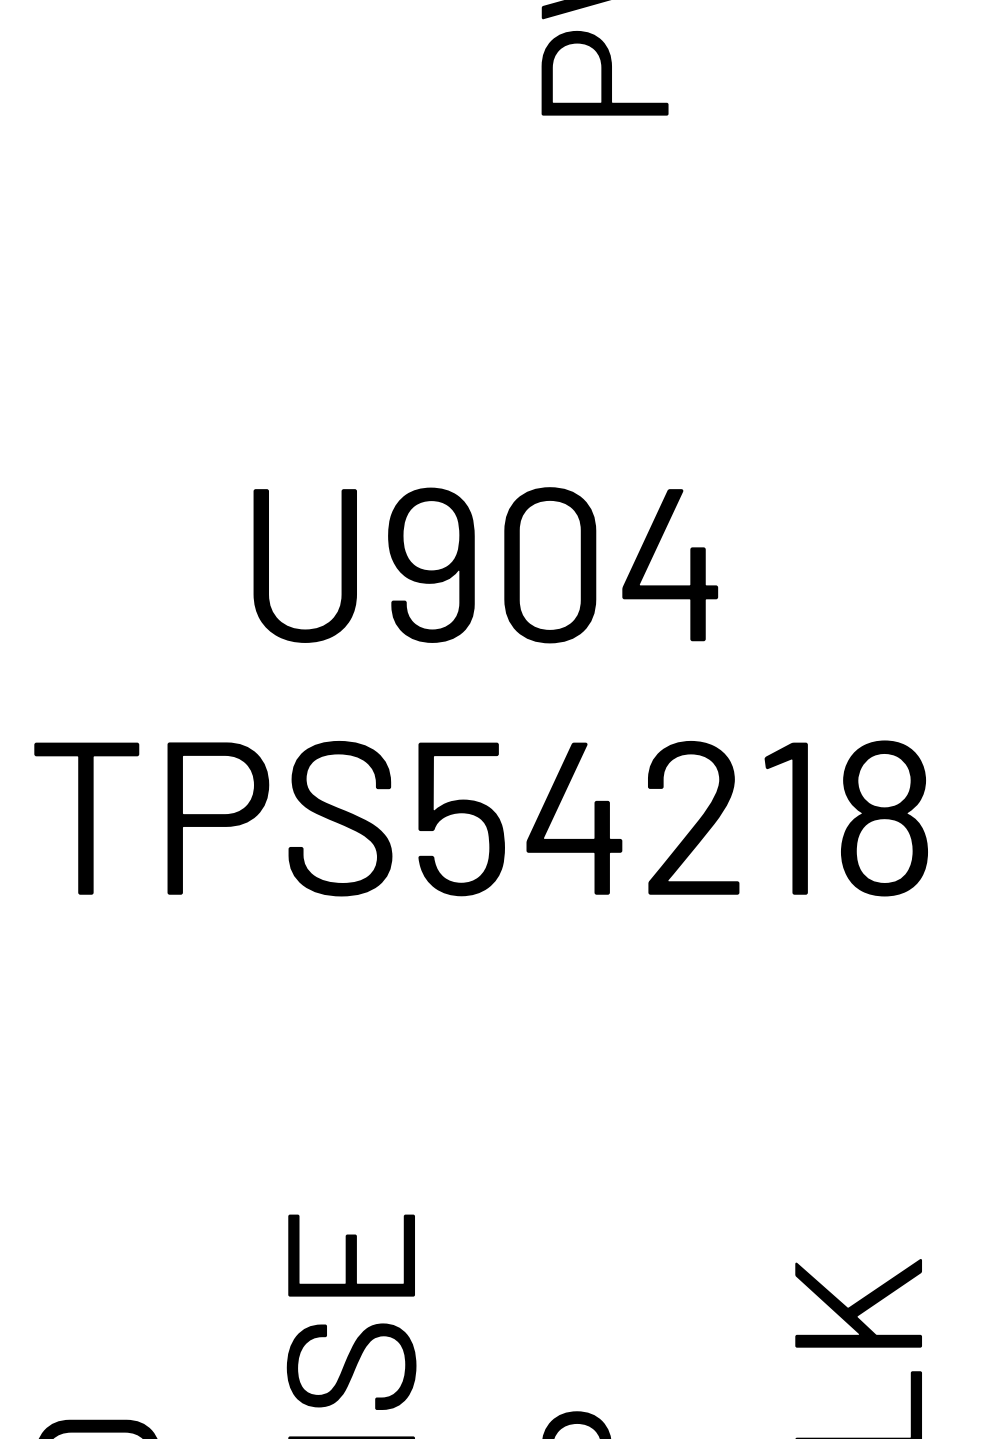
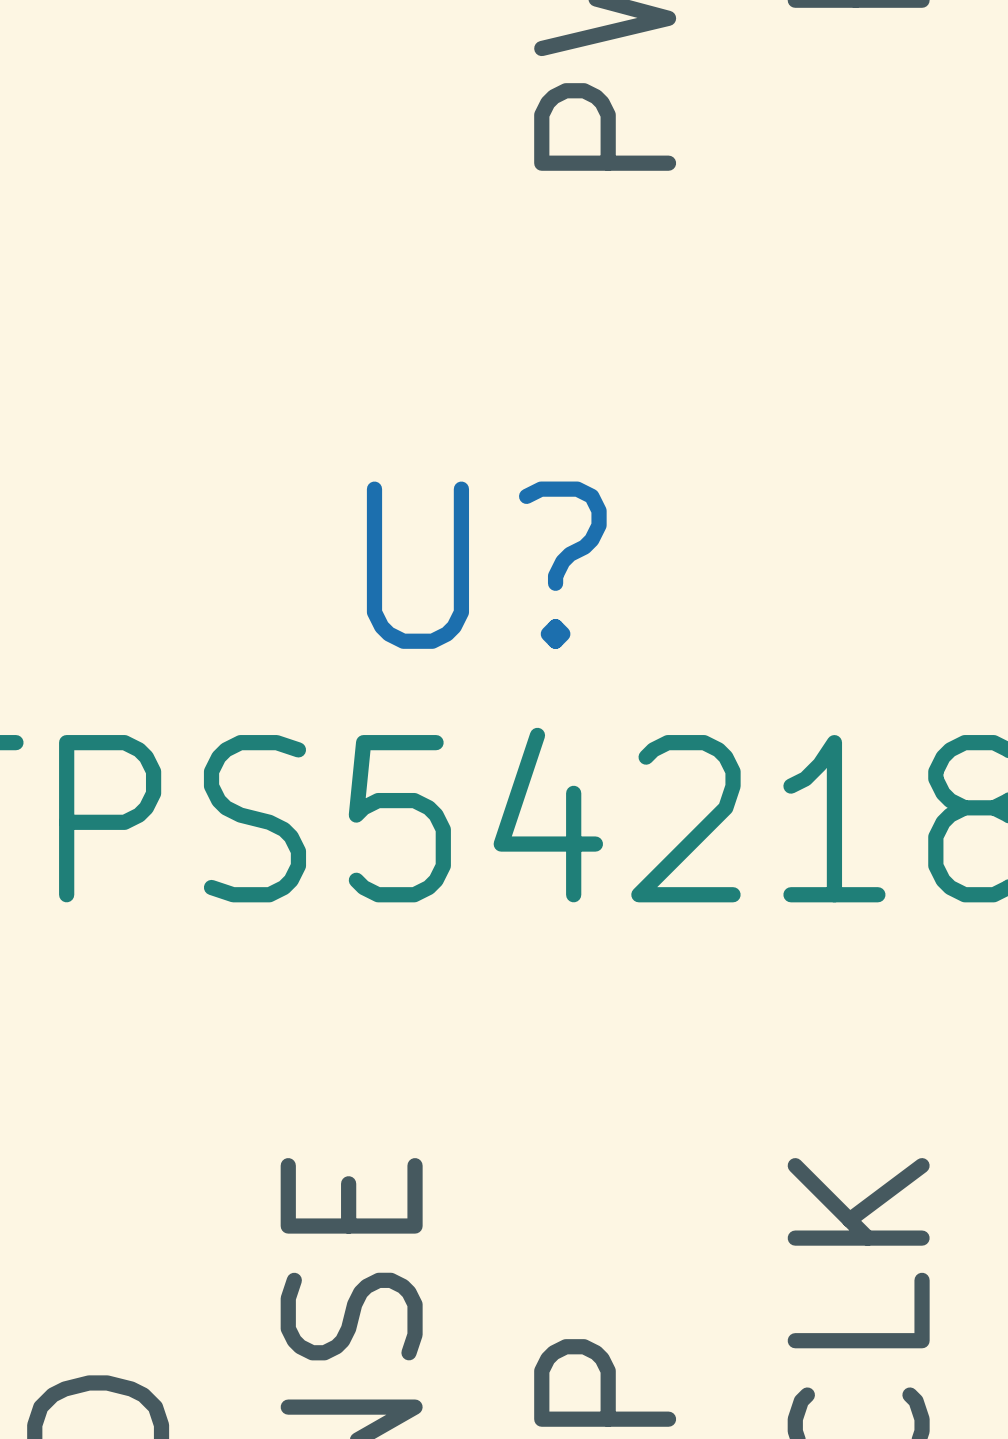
U904 name: U904 (485, 565) -> U? (486, 565)

